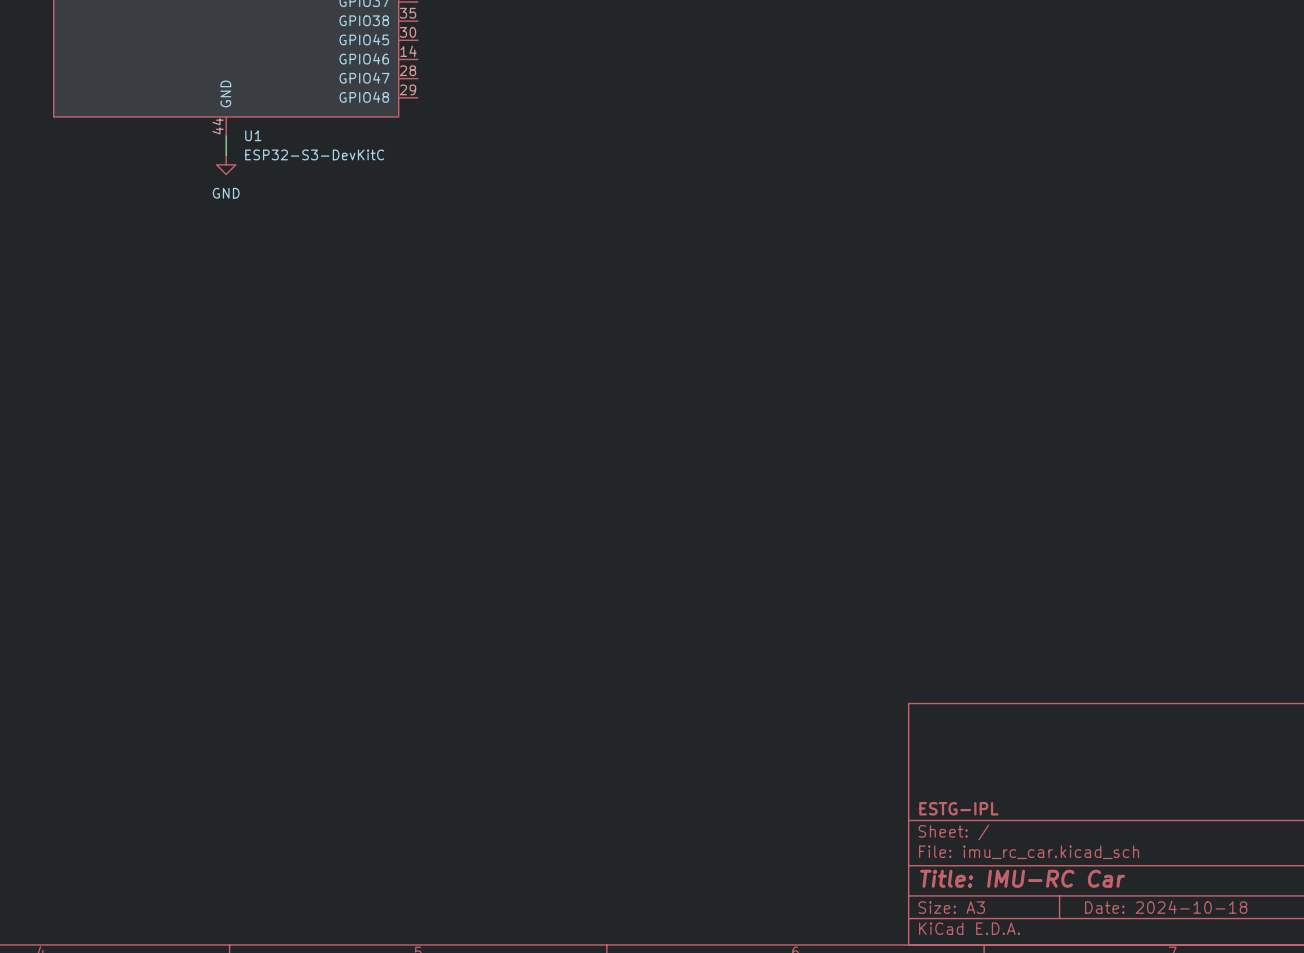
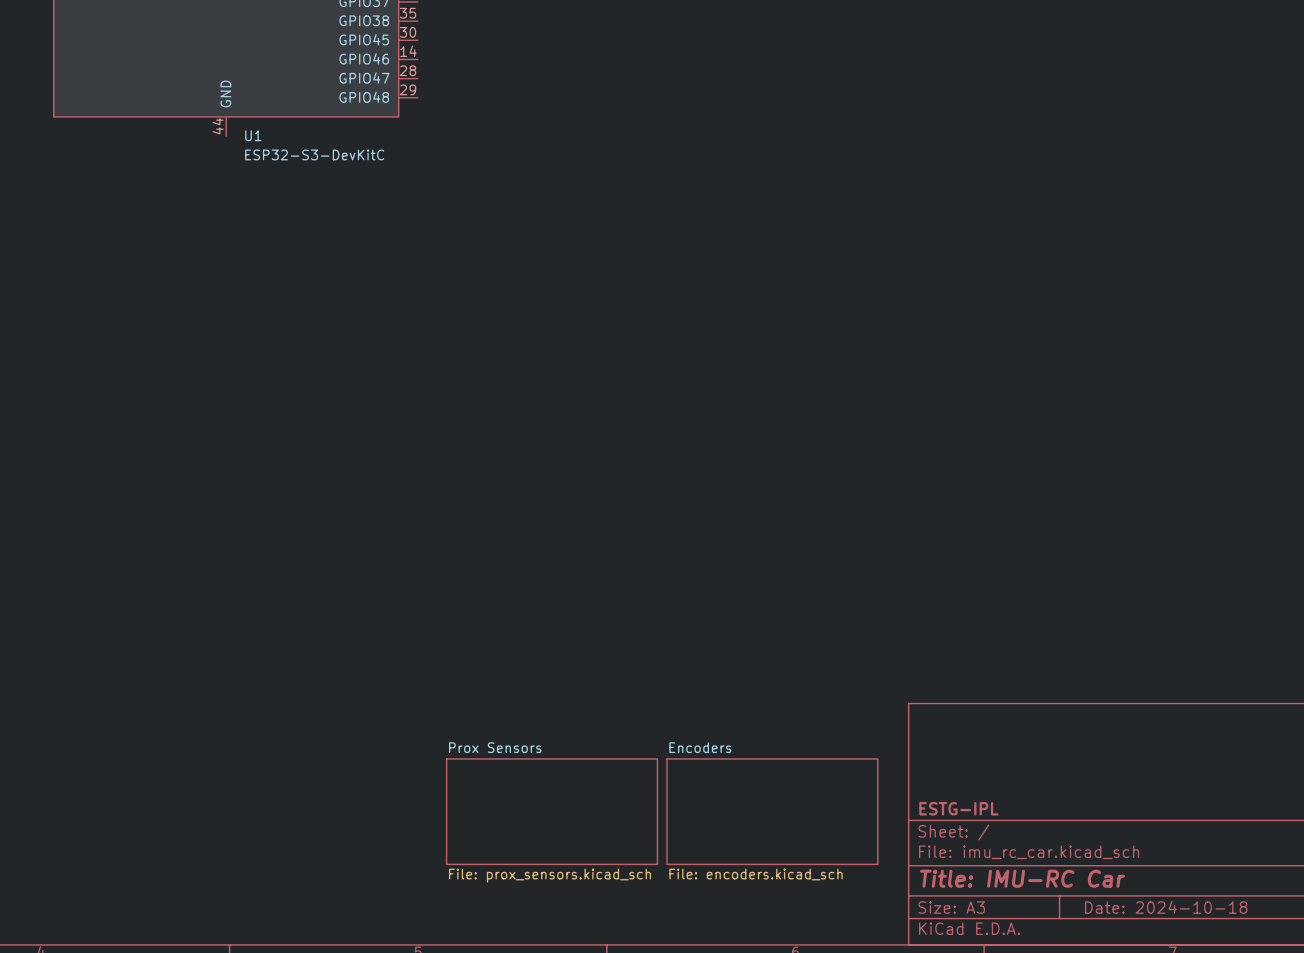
wire: (226, 136) (226, 155) -> none
power symbol: GND (226, 164) -> none
sheet Prox Sensors: none -> File: prox_sensors.kicad_sch (552, 811)
sheet Encoders: none -> File: encoders.kicad_sch (772, 811)

